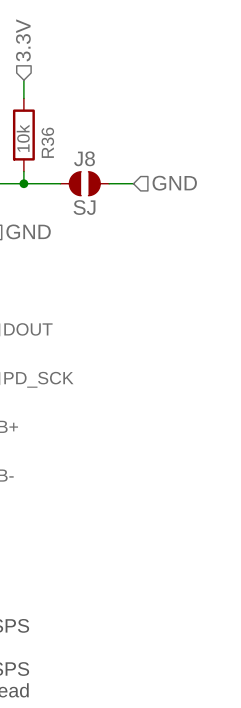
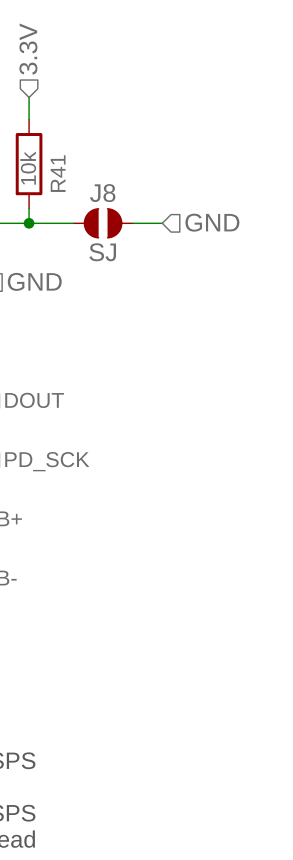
R36 name: R36 (47, 142) -> R41 (58, 173)

